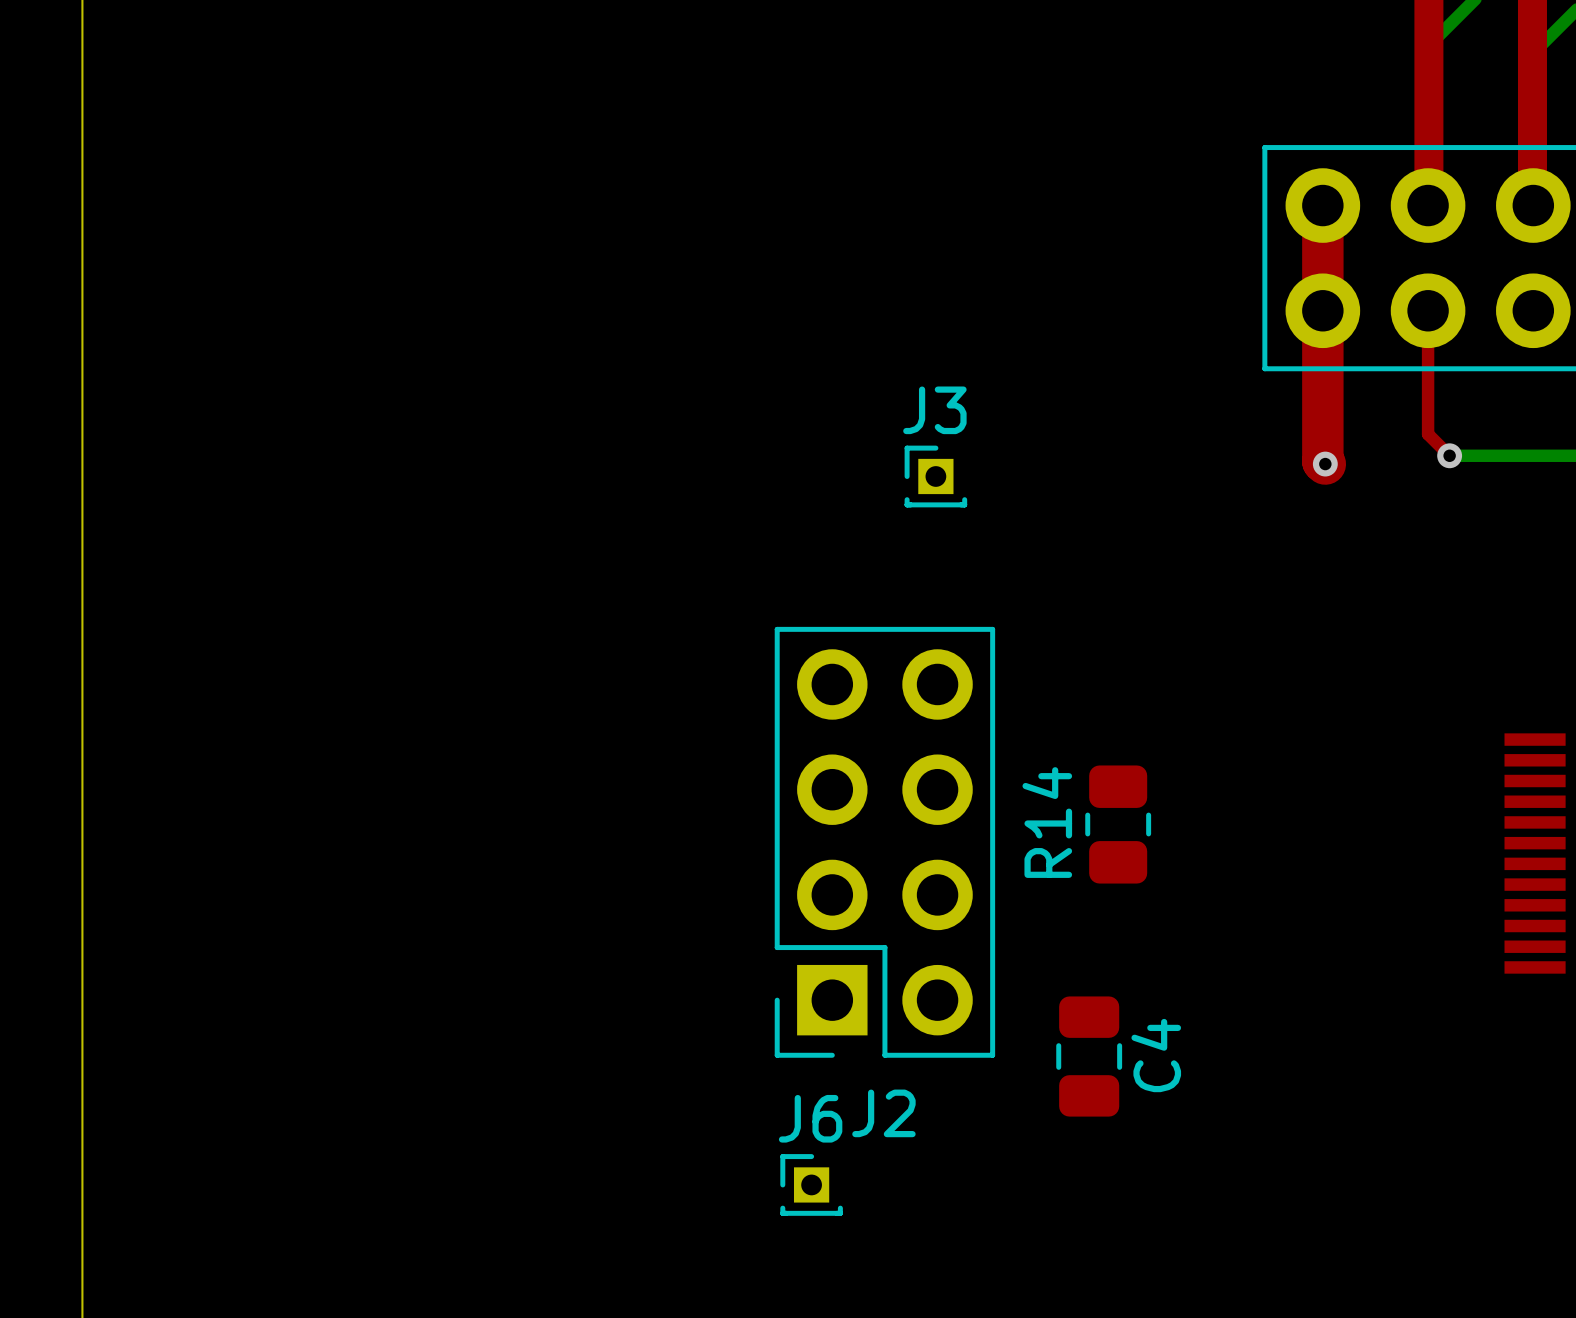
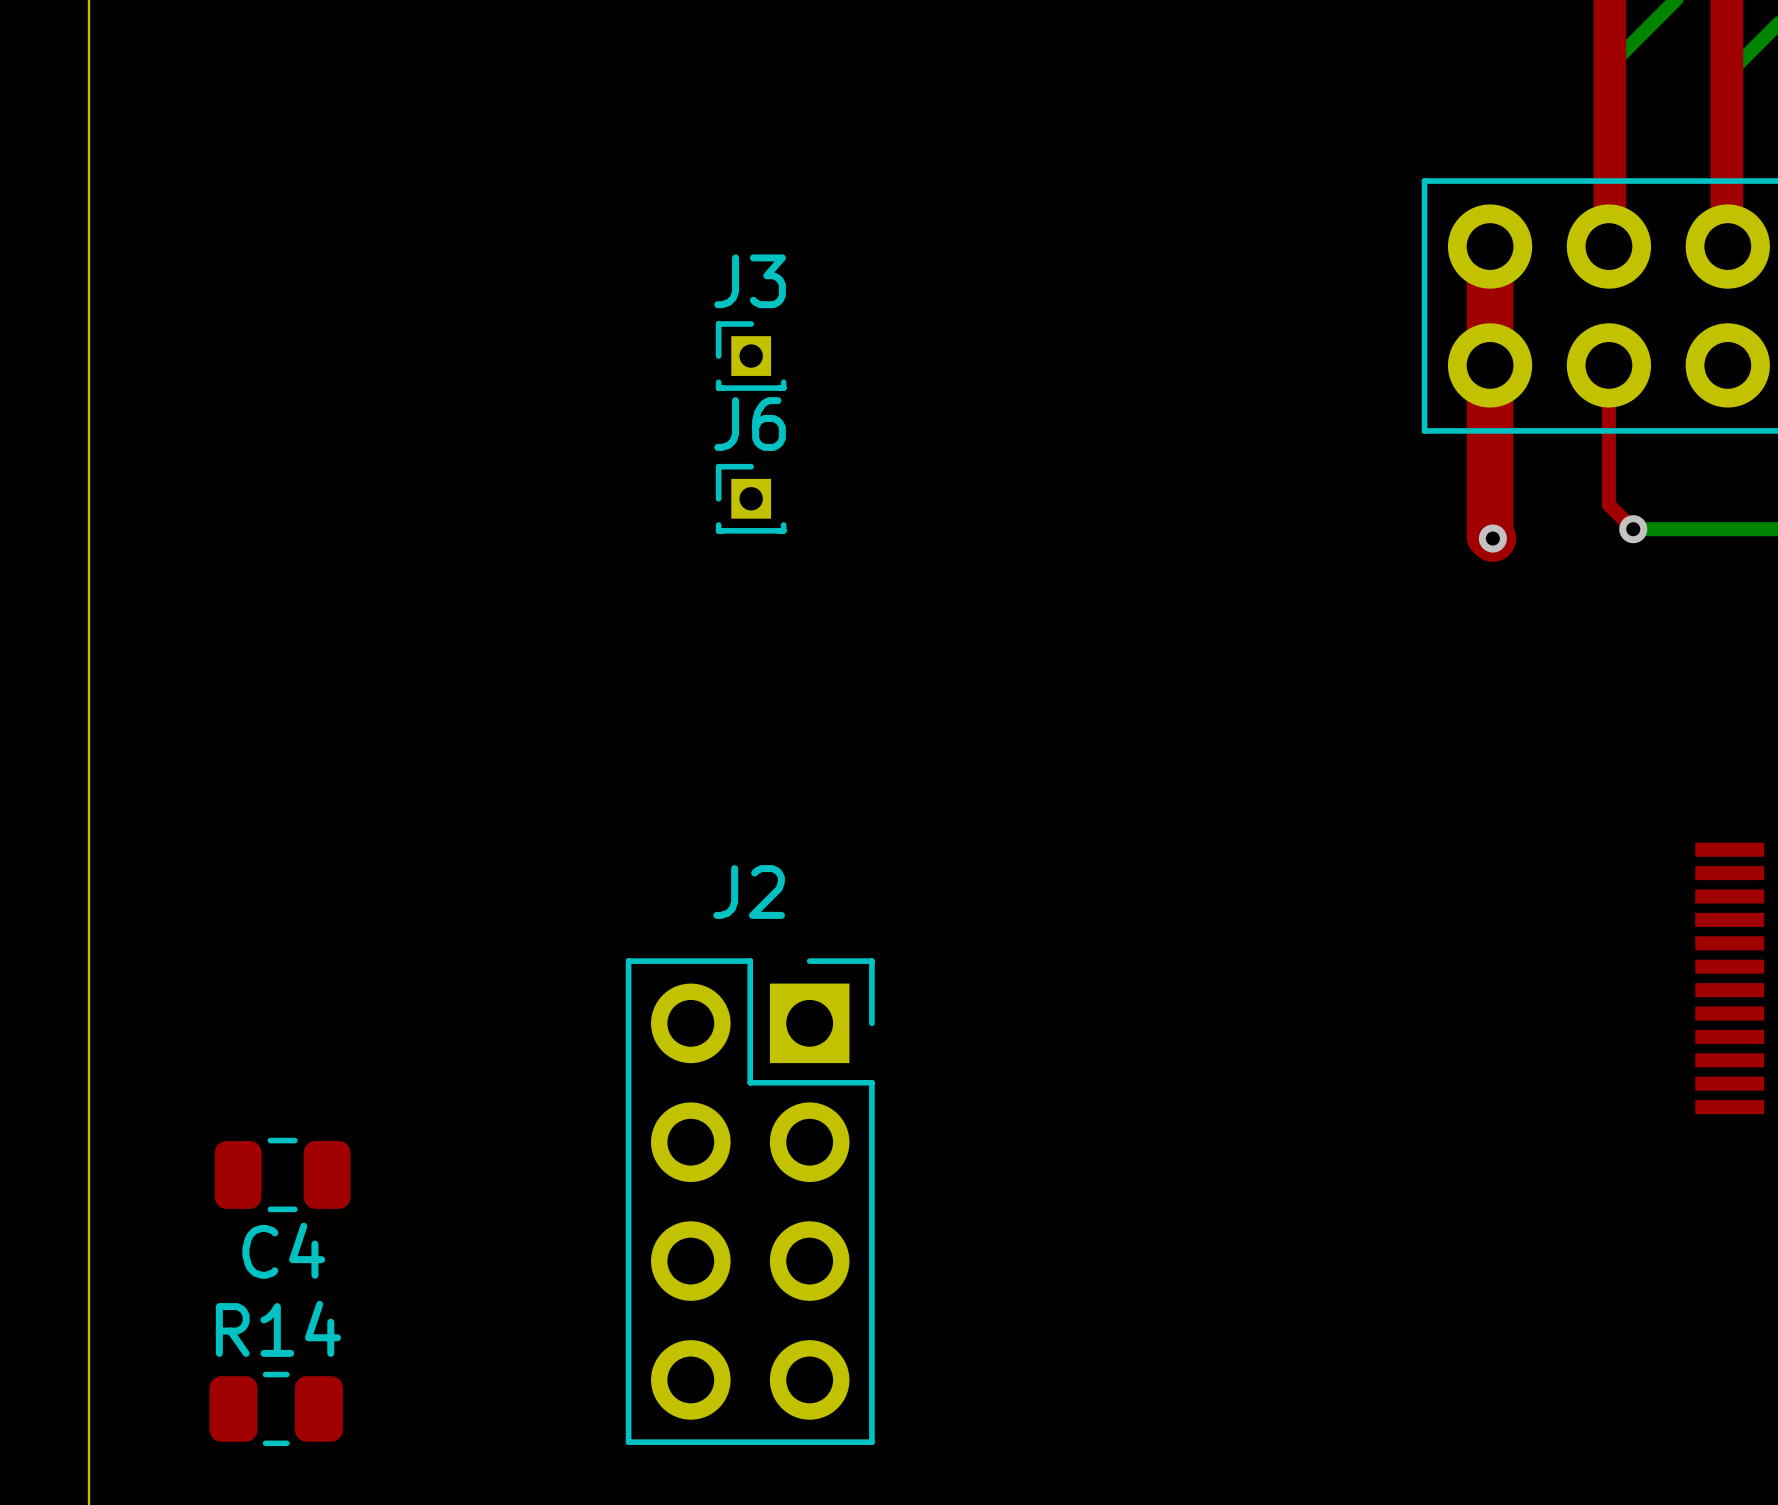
J3 position: (935, 476) -> (751, 356)
R14 rotation: 0° (1118, 824) -> 90° clockwise (276, 1408)
R14 position: (1118, 824) -> (276, 1408)
J2 rotation: 0° (884, 842) -> 180° (750, 1201)
J2 position: (884, 842) -> (750, 1201)
C4 rotation: 0° (1089, 1056) -> 90° clockwise (282, 1174)
C4 position: (1089, 1056) -> (282, 1174)
J6 position: (811, 1184) -> (751, 498)

